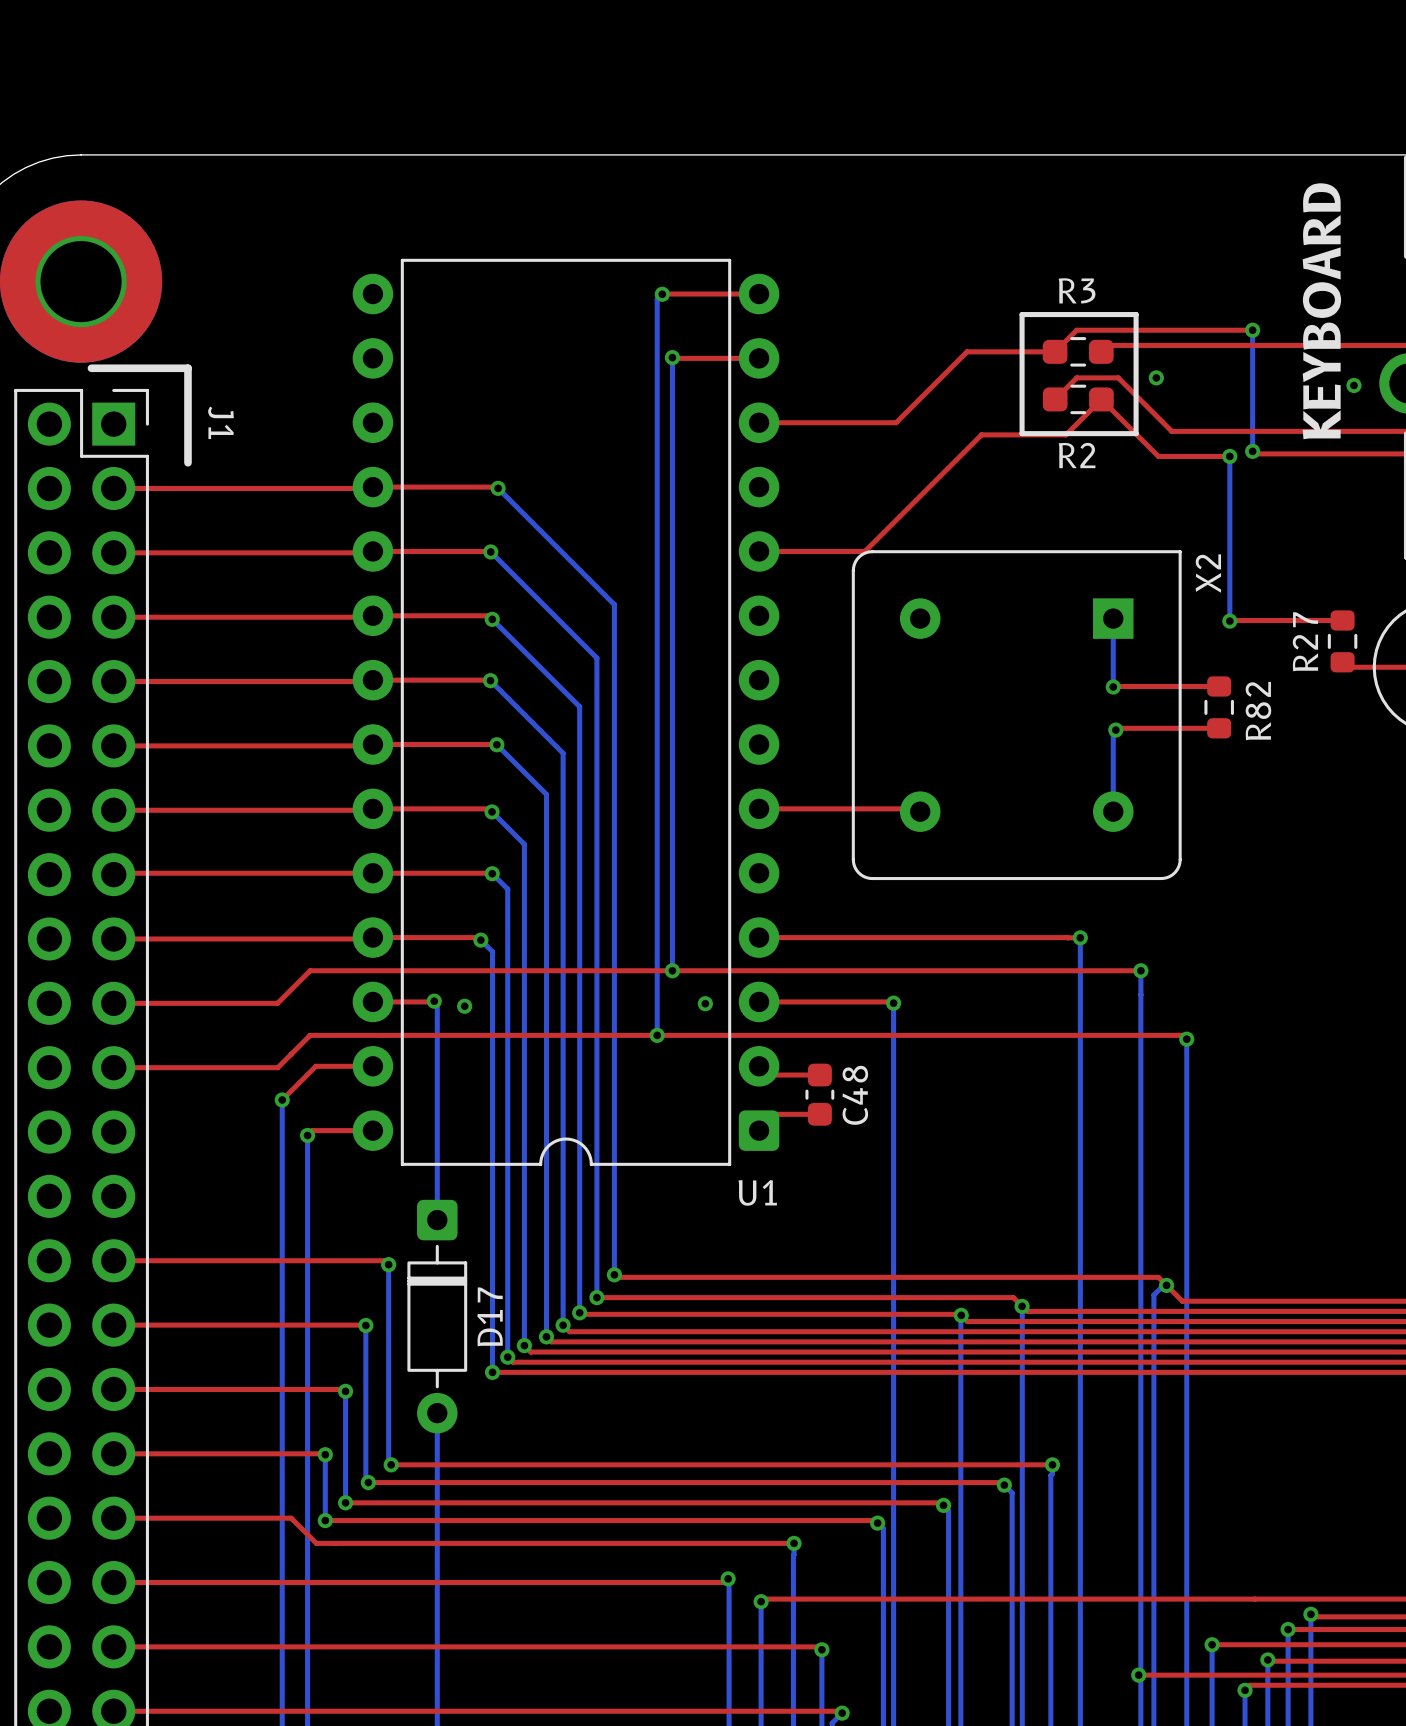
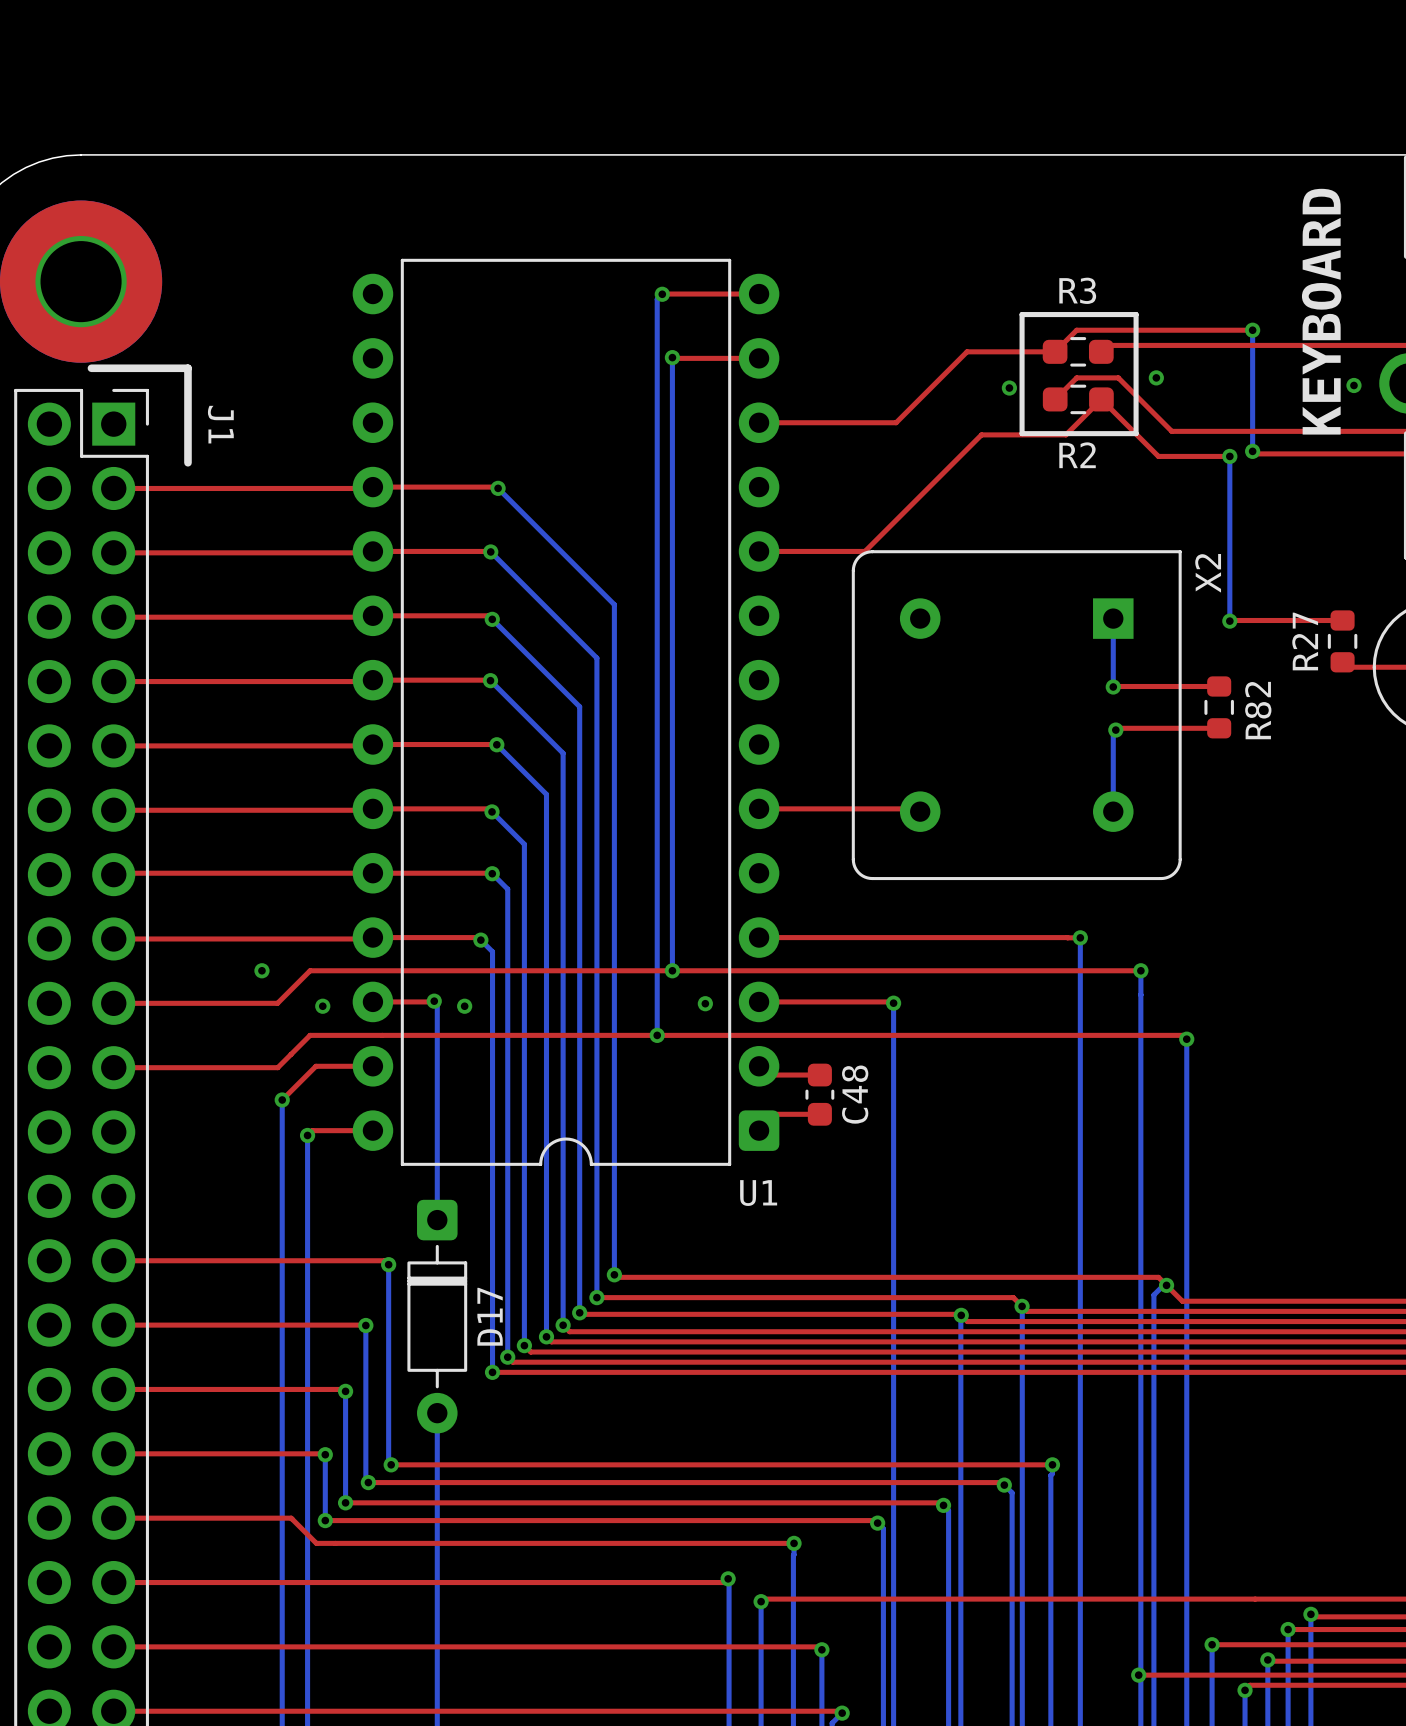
via: none -> (1009, 388)
via: none -> (261, 970)
via: none -> (322, 1006)

